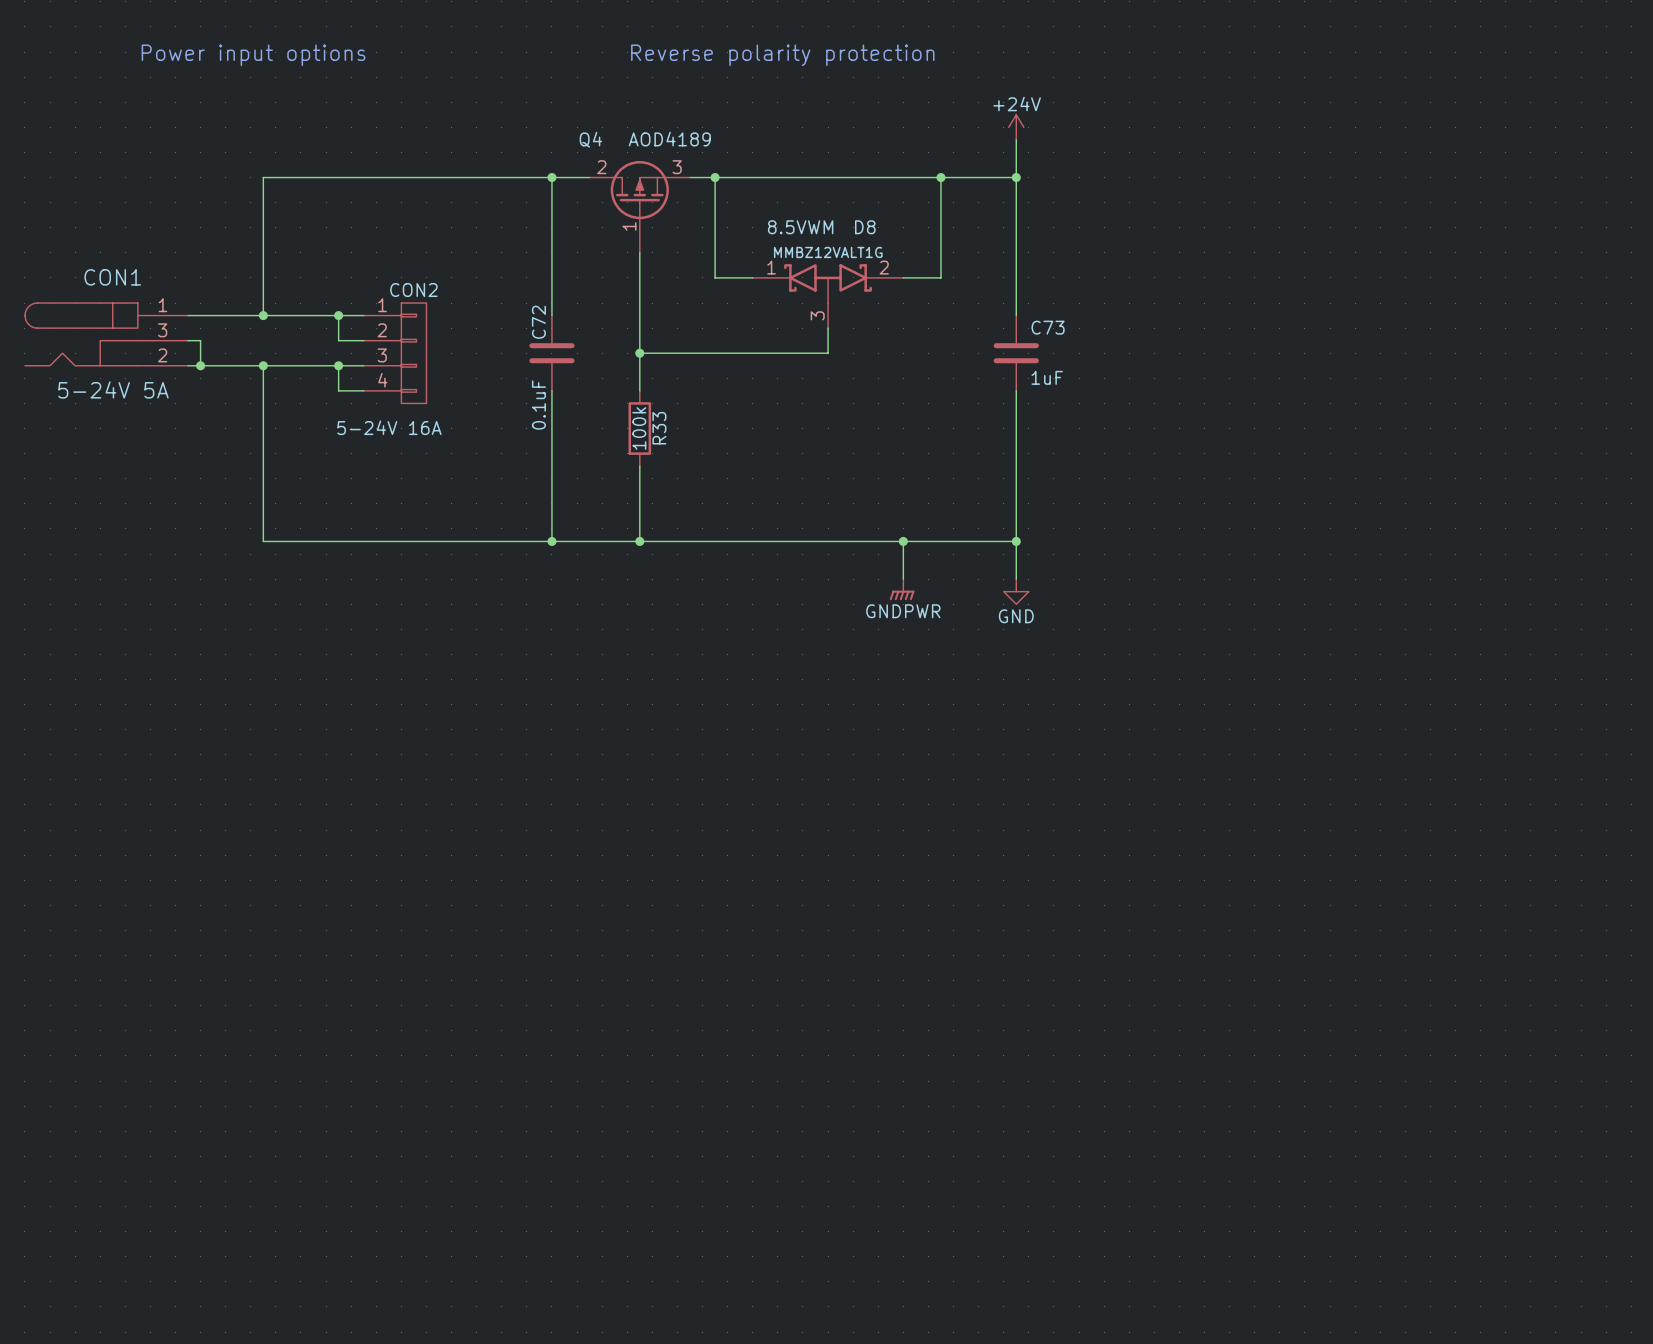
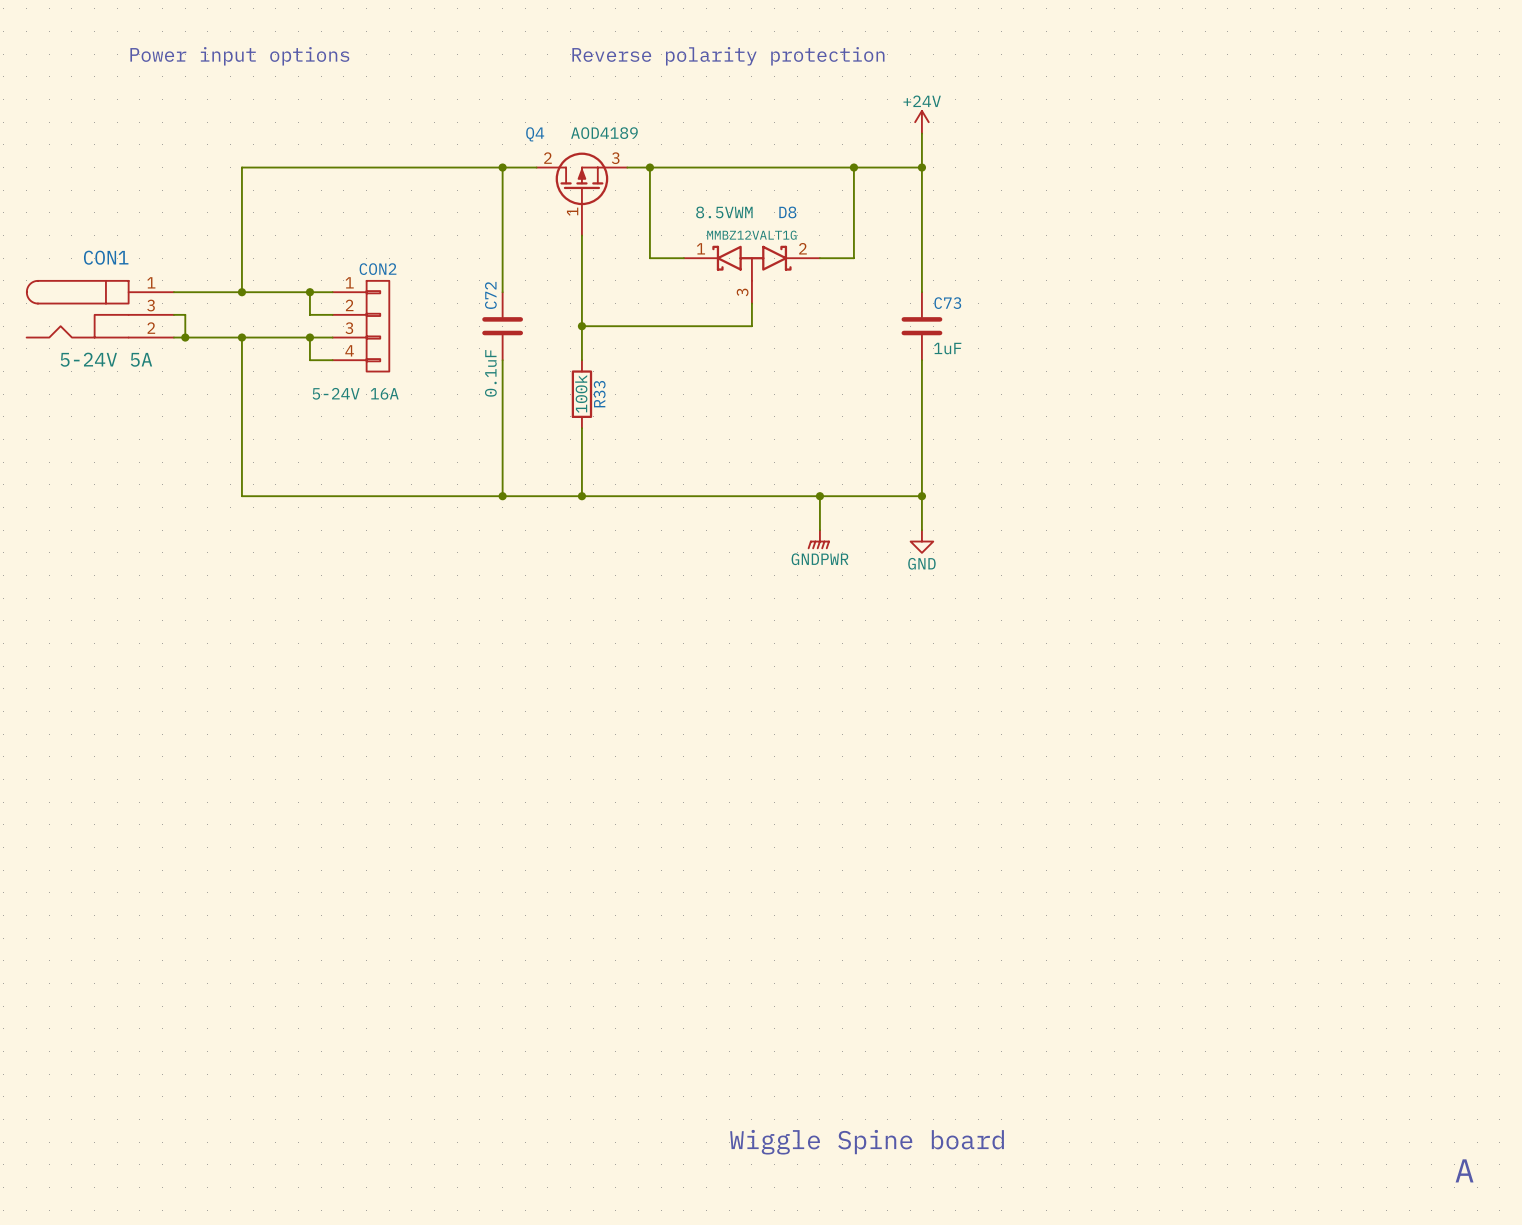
text: none -> Wiggle Spine board (867, 1142)
text: none -> A (1464, 1170)

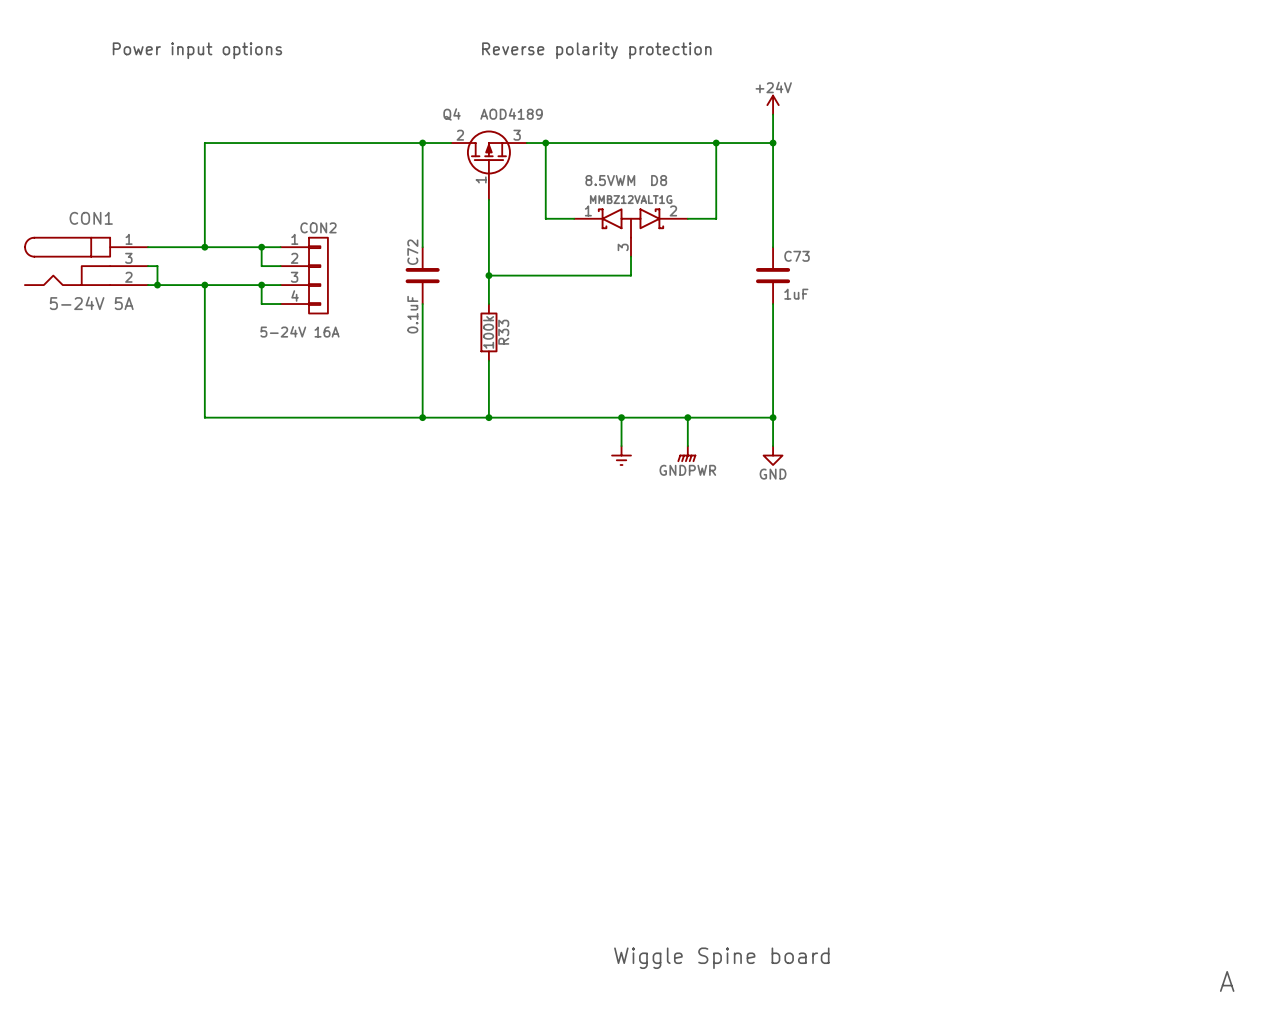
wire: none -> (621, 417) (621, 446)
junction: none -> (621, 417)
power symbol: none -> (621, 455)

